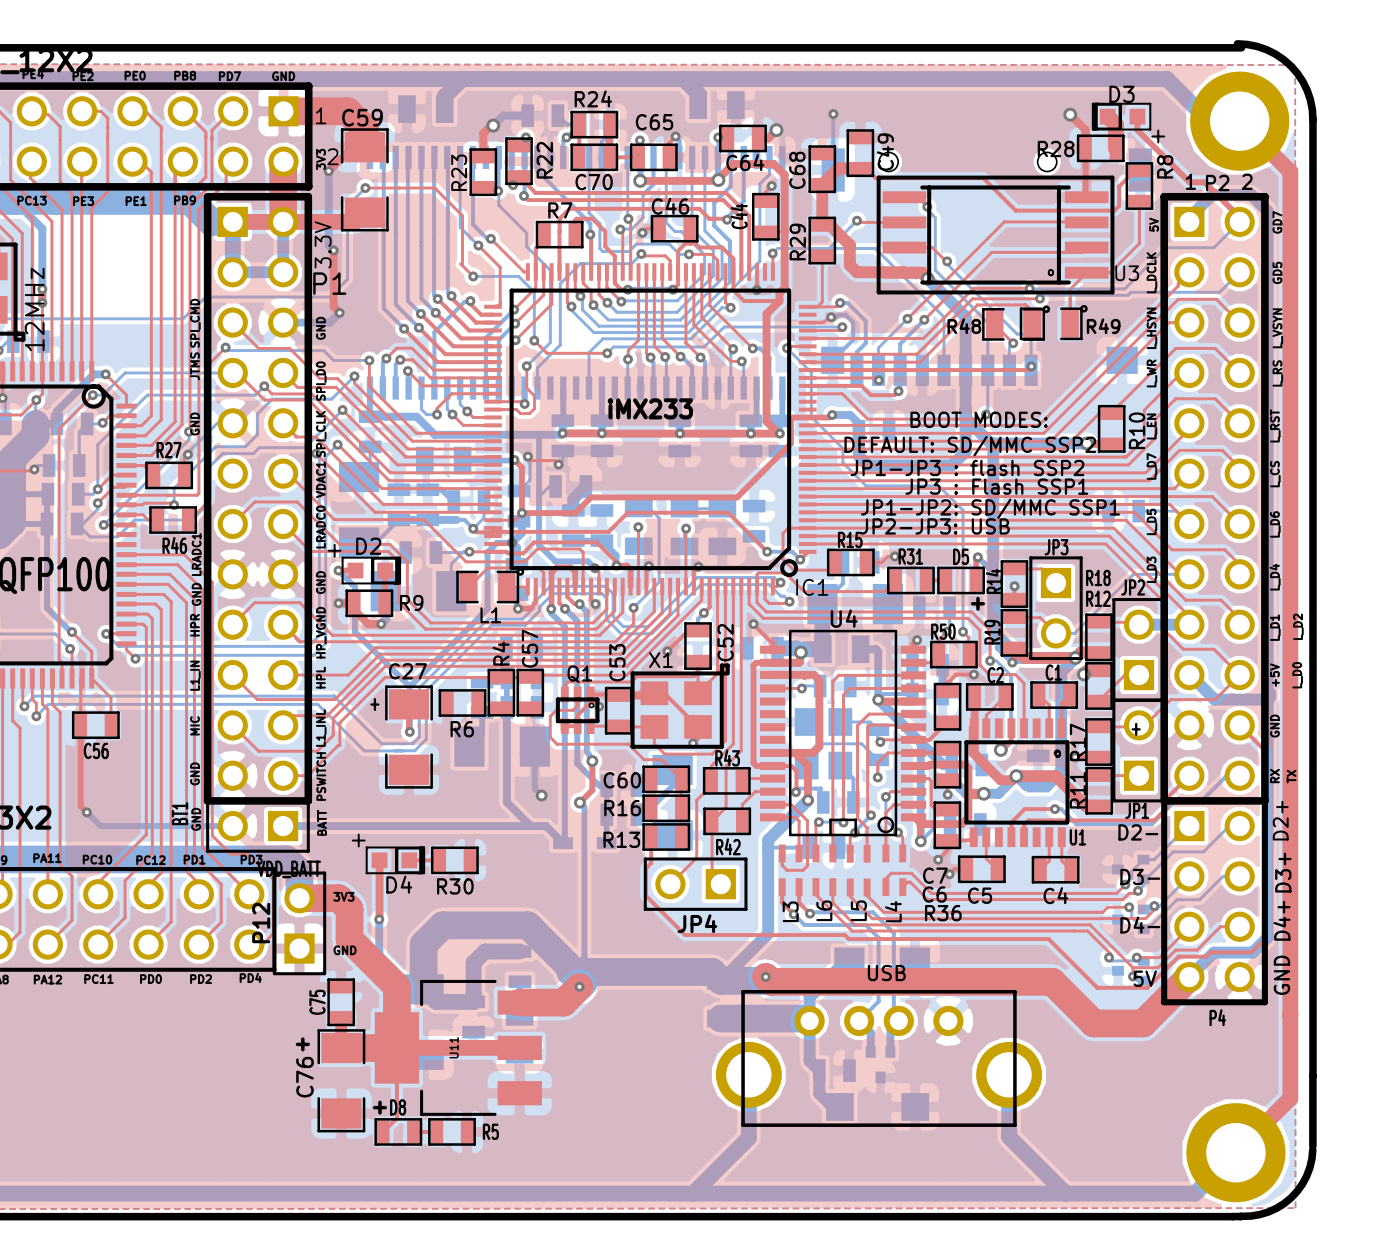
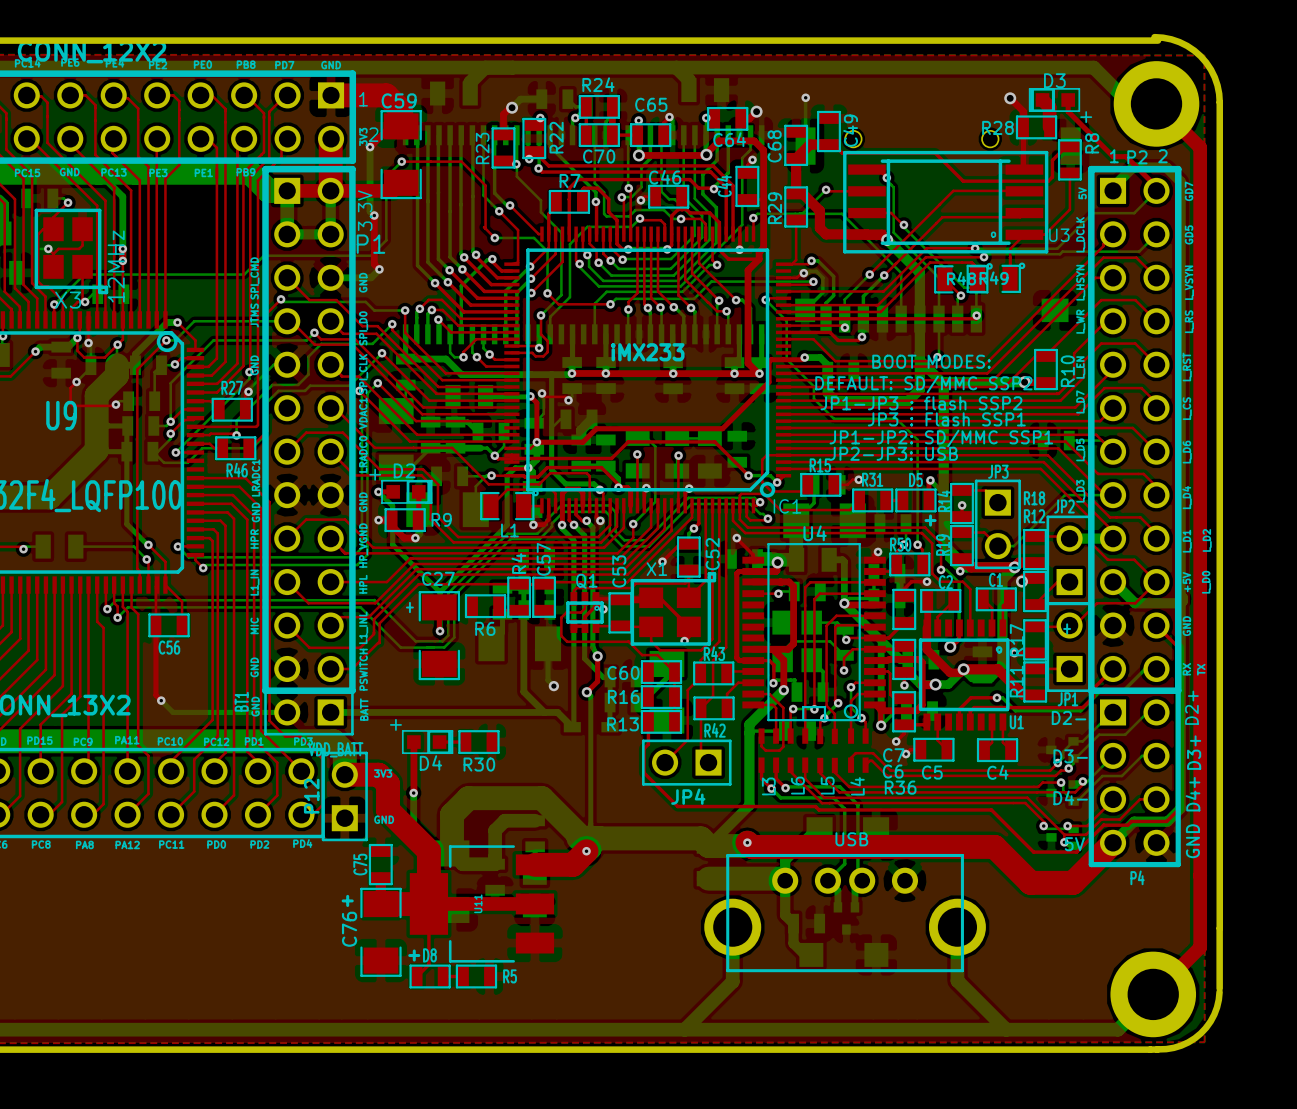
R48 name position: R48 (964, 326) -> R48 (961, 278)
R49 name position: R49 (1103, 326) -> R49 (994, 278)

